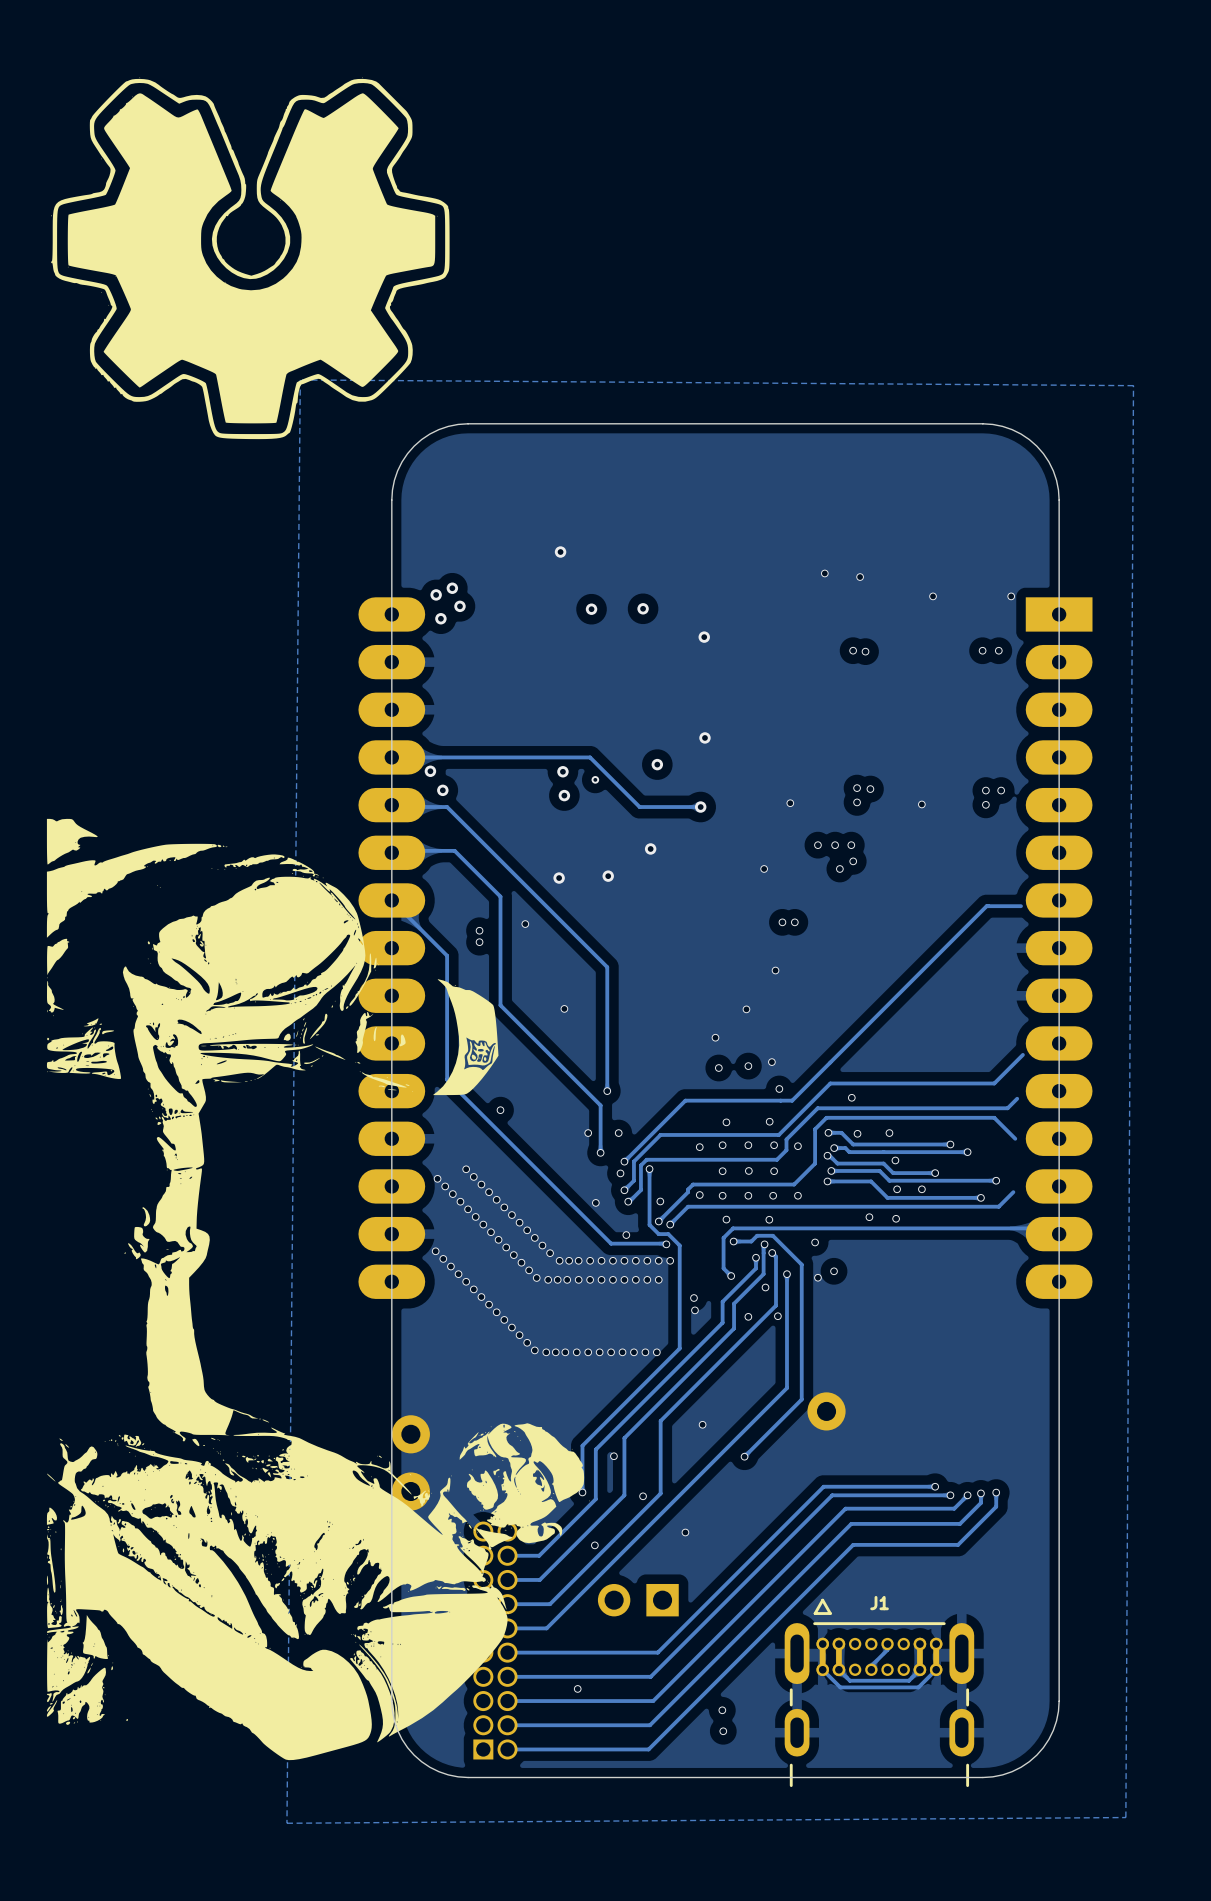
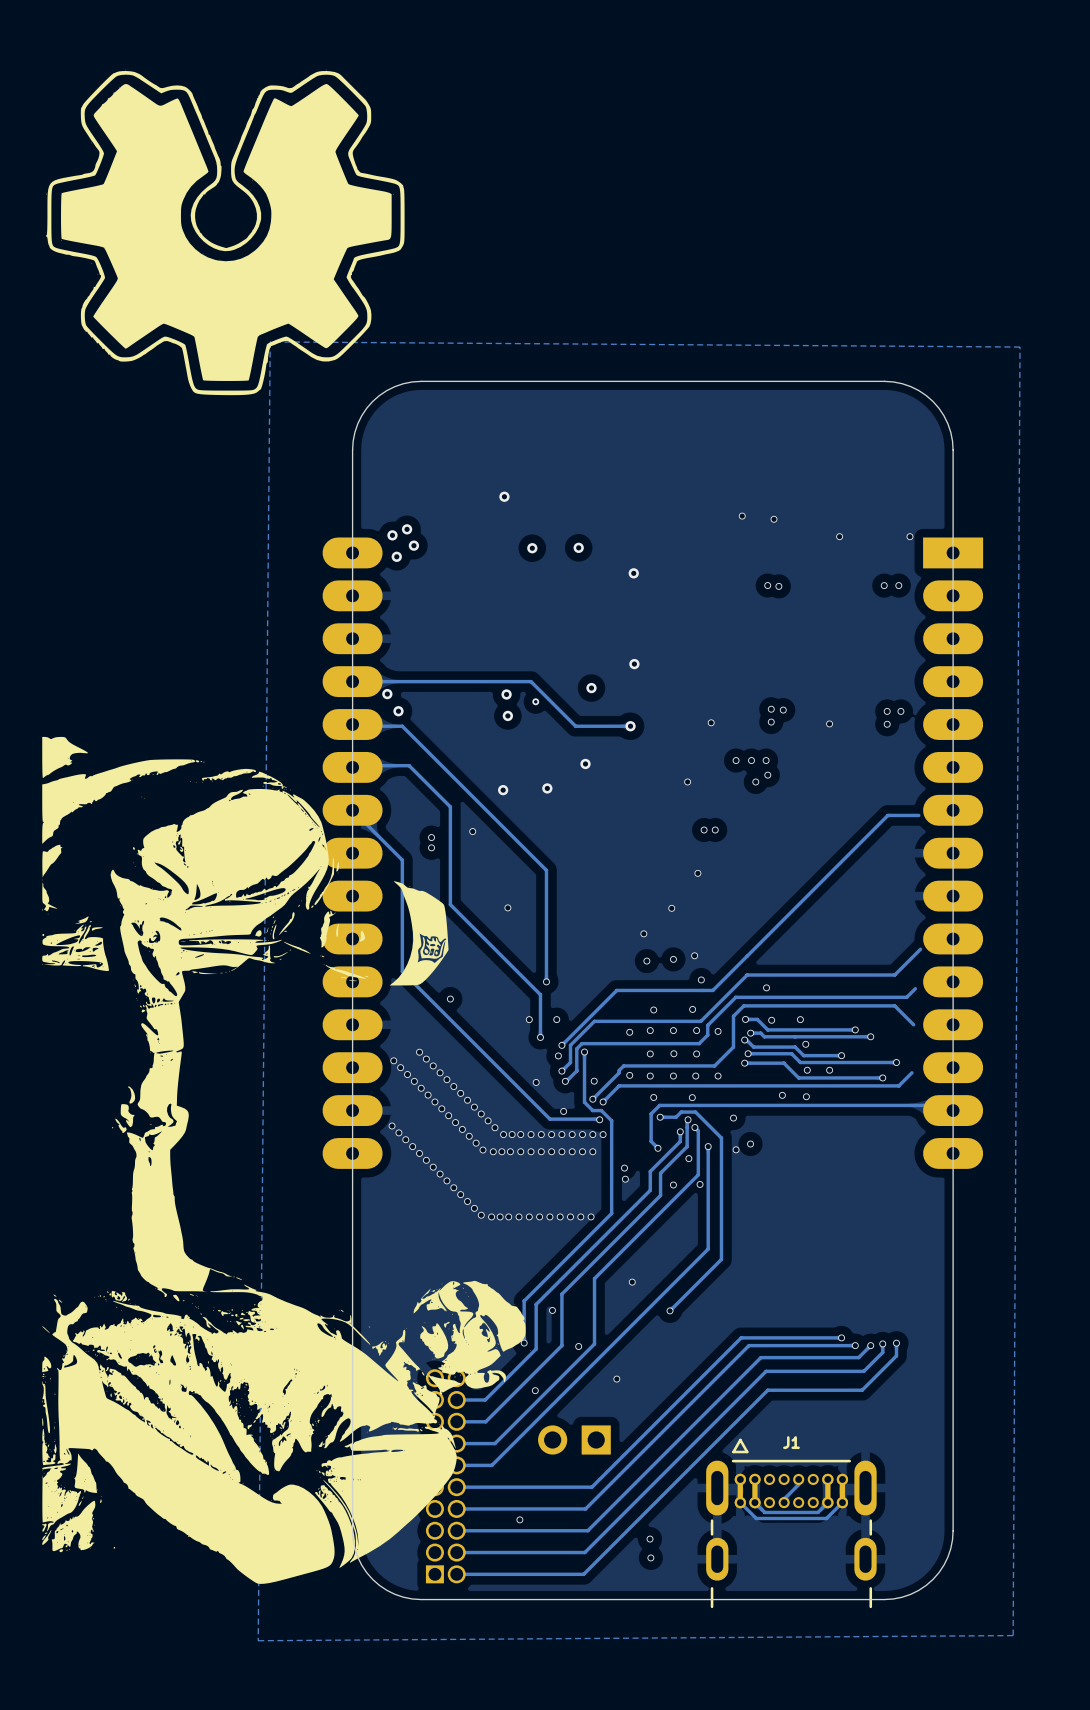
part: (826, 1411) -> none
part: (410, 1434) -> none
part: (410, 1491) -> none

